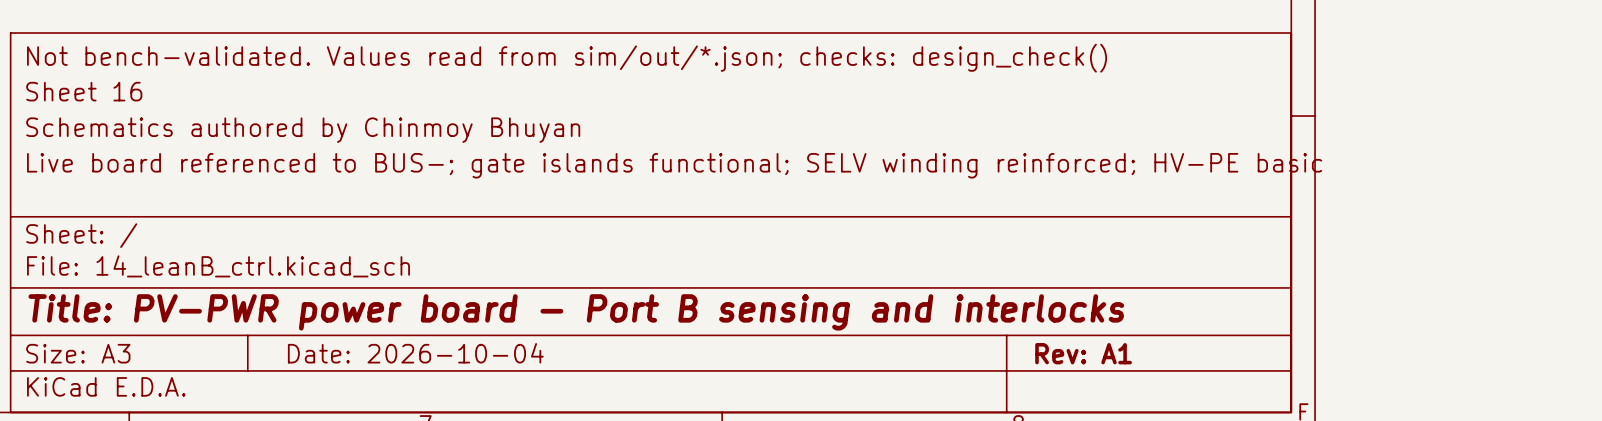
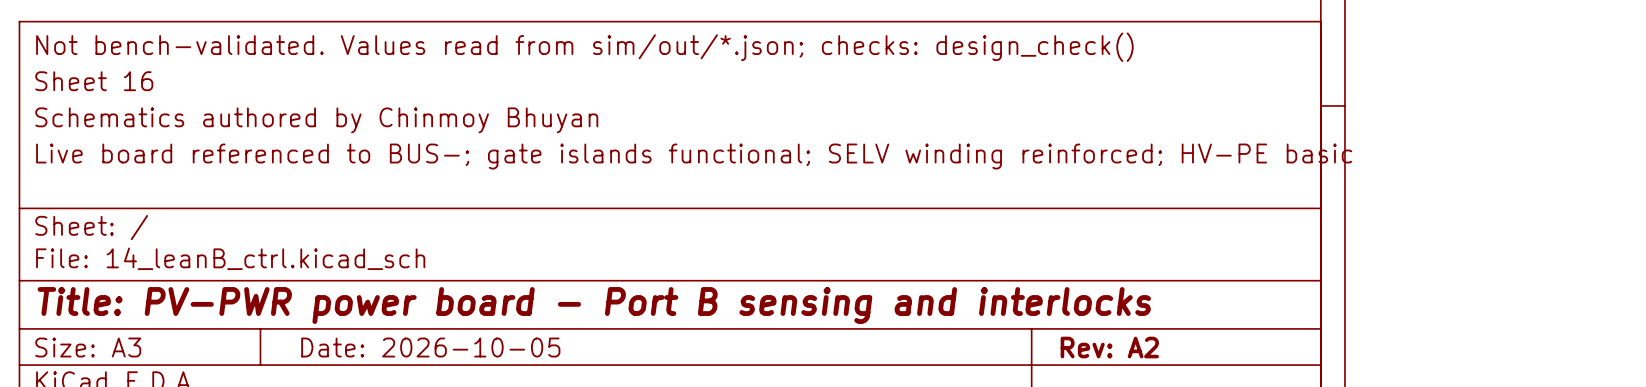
title block: Date: 2026-10-04 (415, 353) -> Date: 2026-10-05 (430, 347)
title block: Rev: A1 (1083, 353) -> Rev: A2 (1109, 347)

